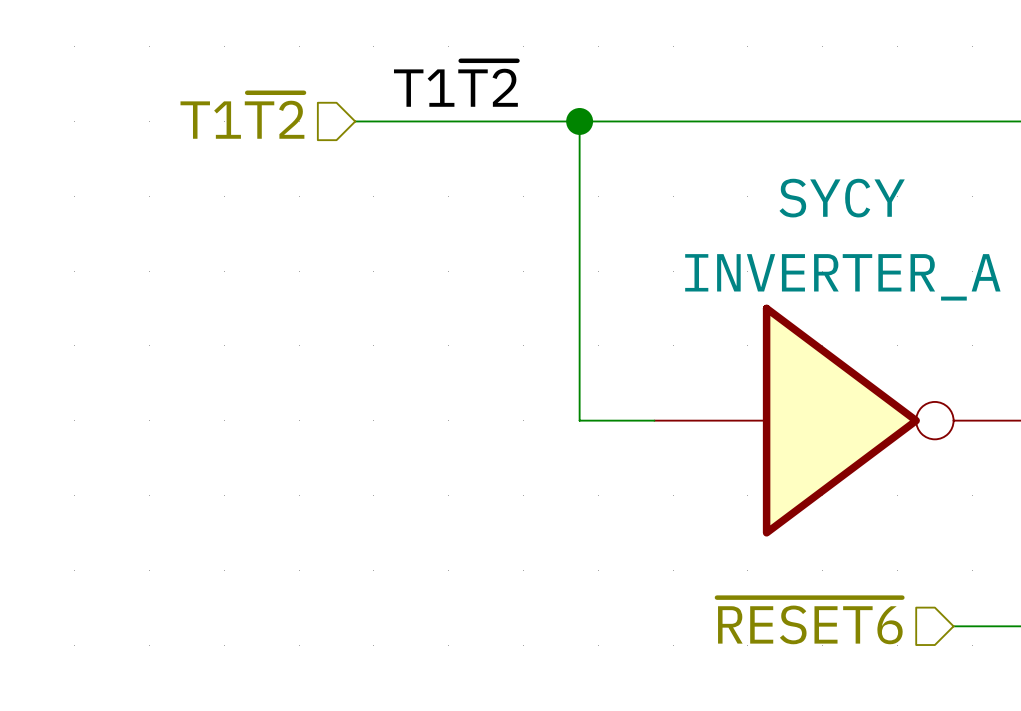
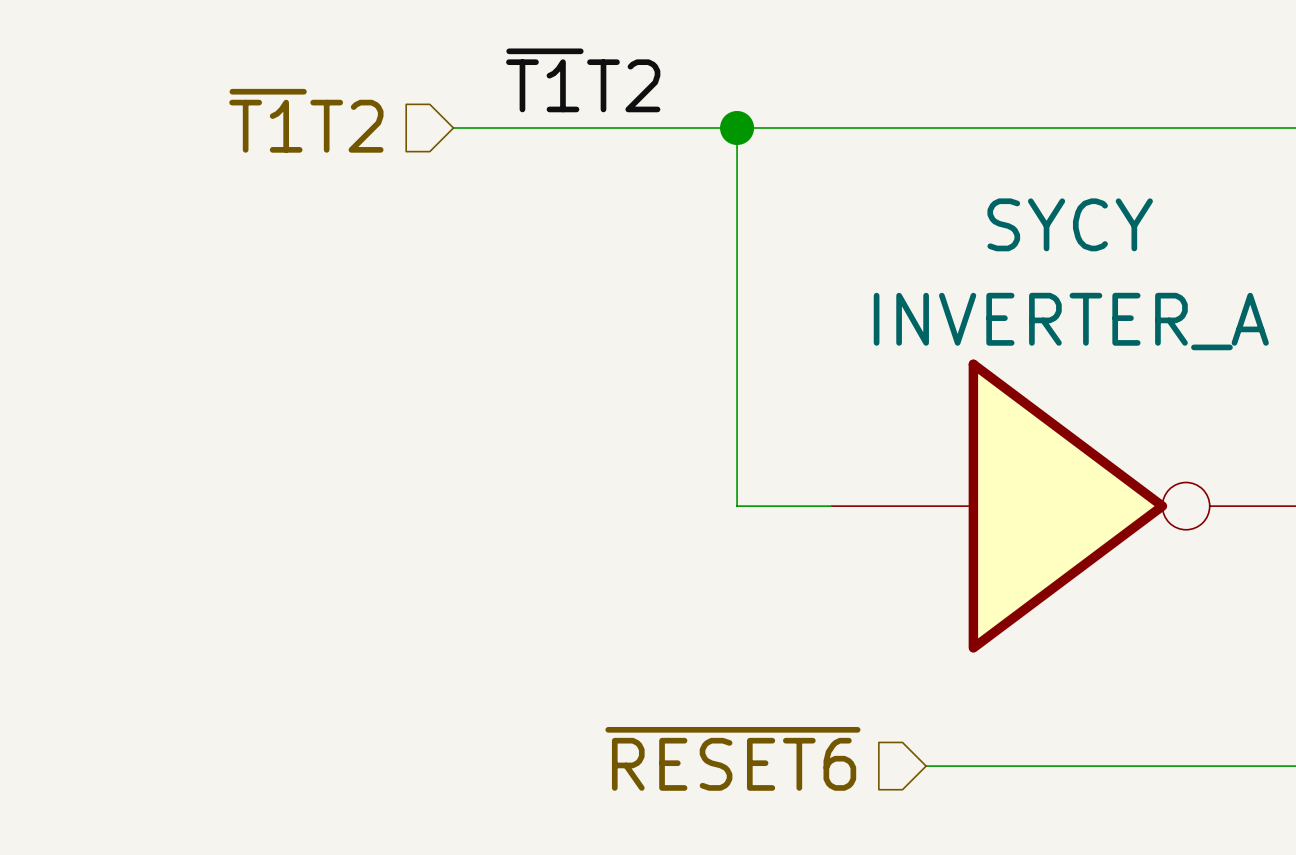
label: T1~{T2} (455, 83) -> ~{T1}T2 (583, 80)
hierarchical label: T1~{T2} (242, 115) -> ~{T1}T2 (306, 120)
hierarchical label position: ~{RESET6} (809, 620) -> ~{RESET6} (732, 758)
wire: none -> (926, 766) (1209, 766)

